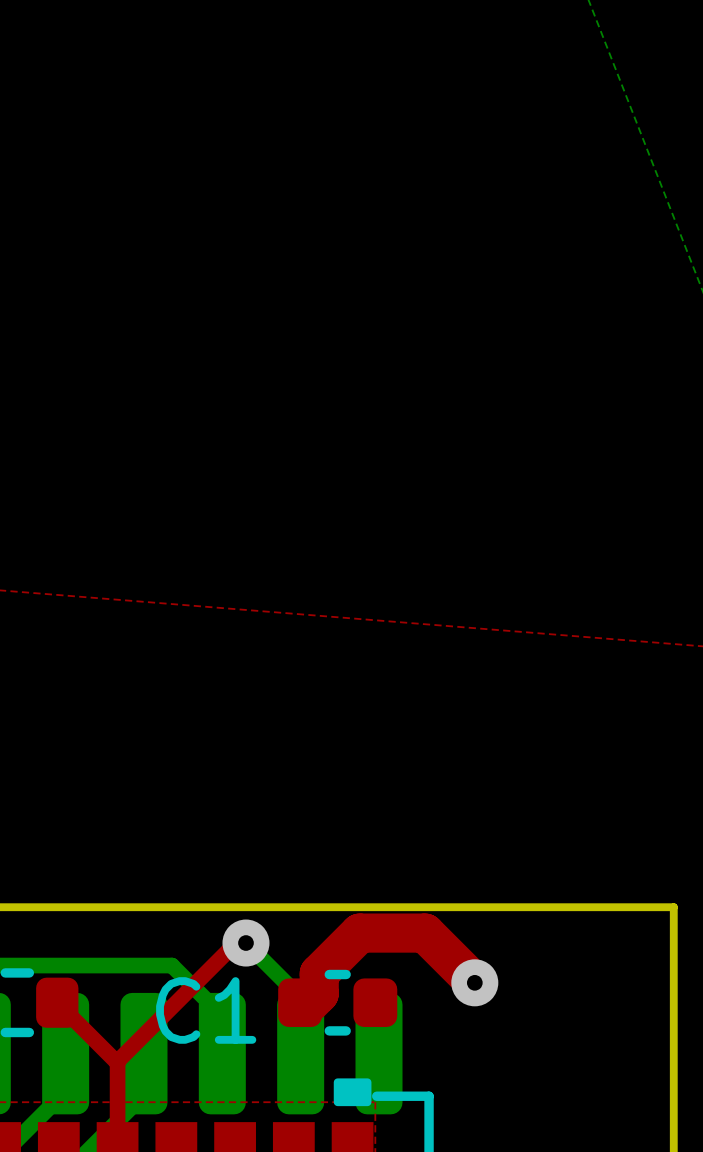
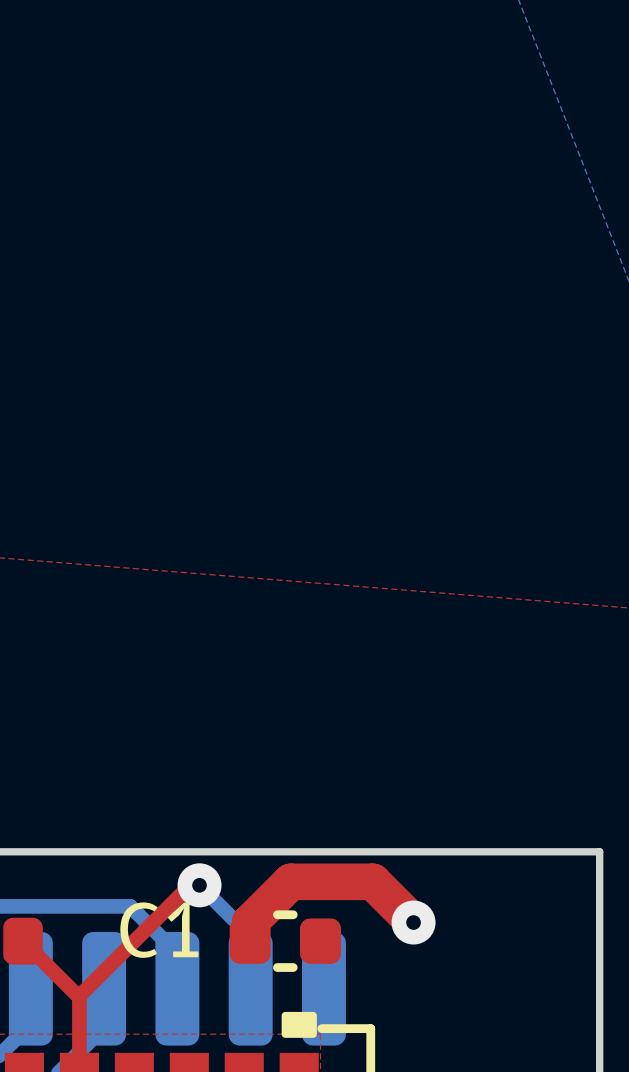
top track: (431, 939) (425, 933) (359, 933) (319, 973) (319, 993) (310, 1002) -> (372, 881) (290, 881) (250, 922) (250, 941)
C1 name position: C1 (206, 1010) -> C1 (159, 930)

